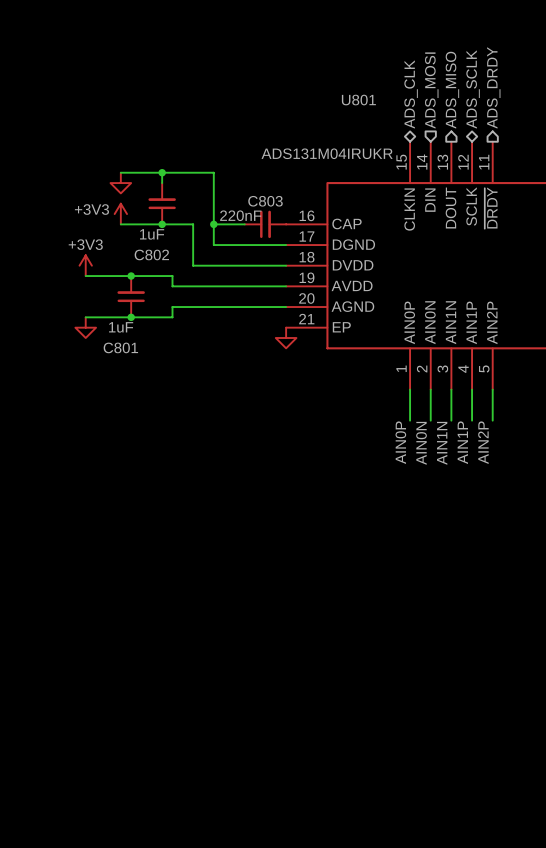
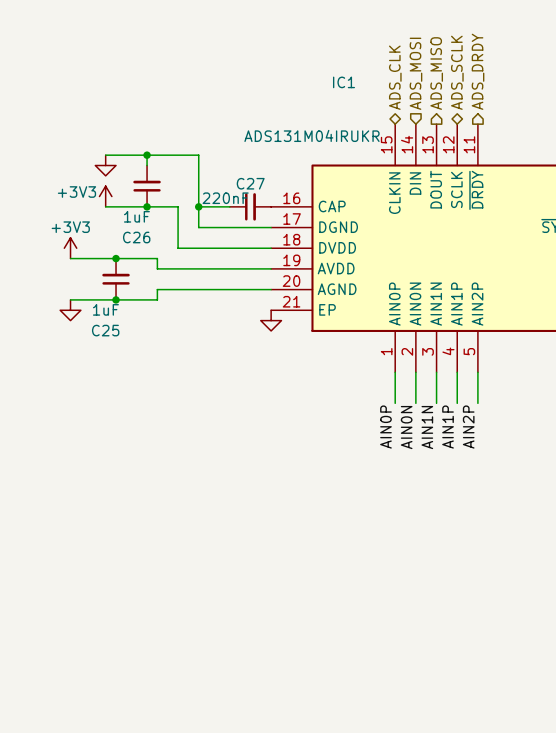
U801 name: U801 (358, 100) -> IC1 (344, 82)
C803 name: C803 (265, 201) -> C27 (250, 183)
C802 name: C802 (151, 254) -> C26 (136, 237)
C801 name: C801 (120, 347) -> C25 (105, 330)

